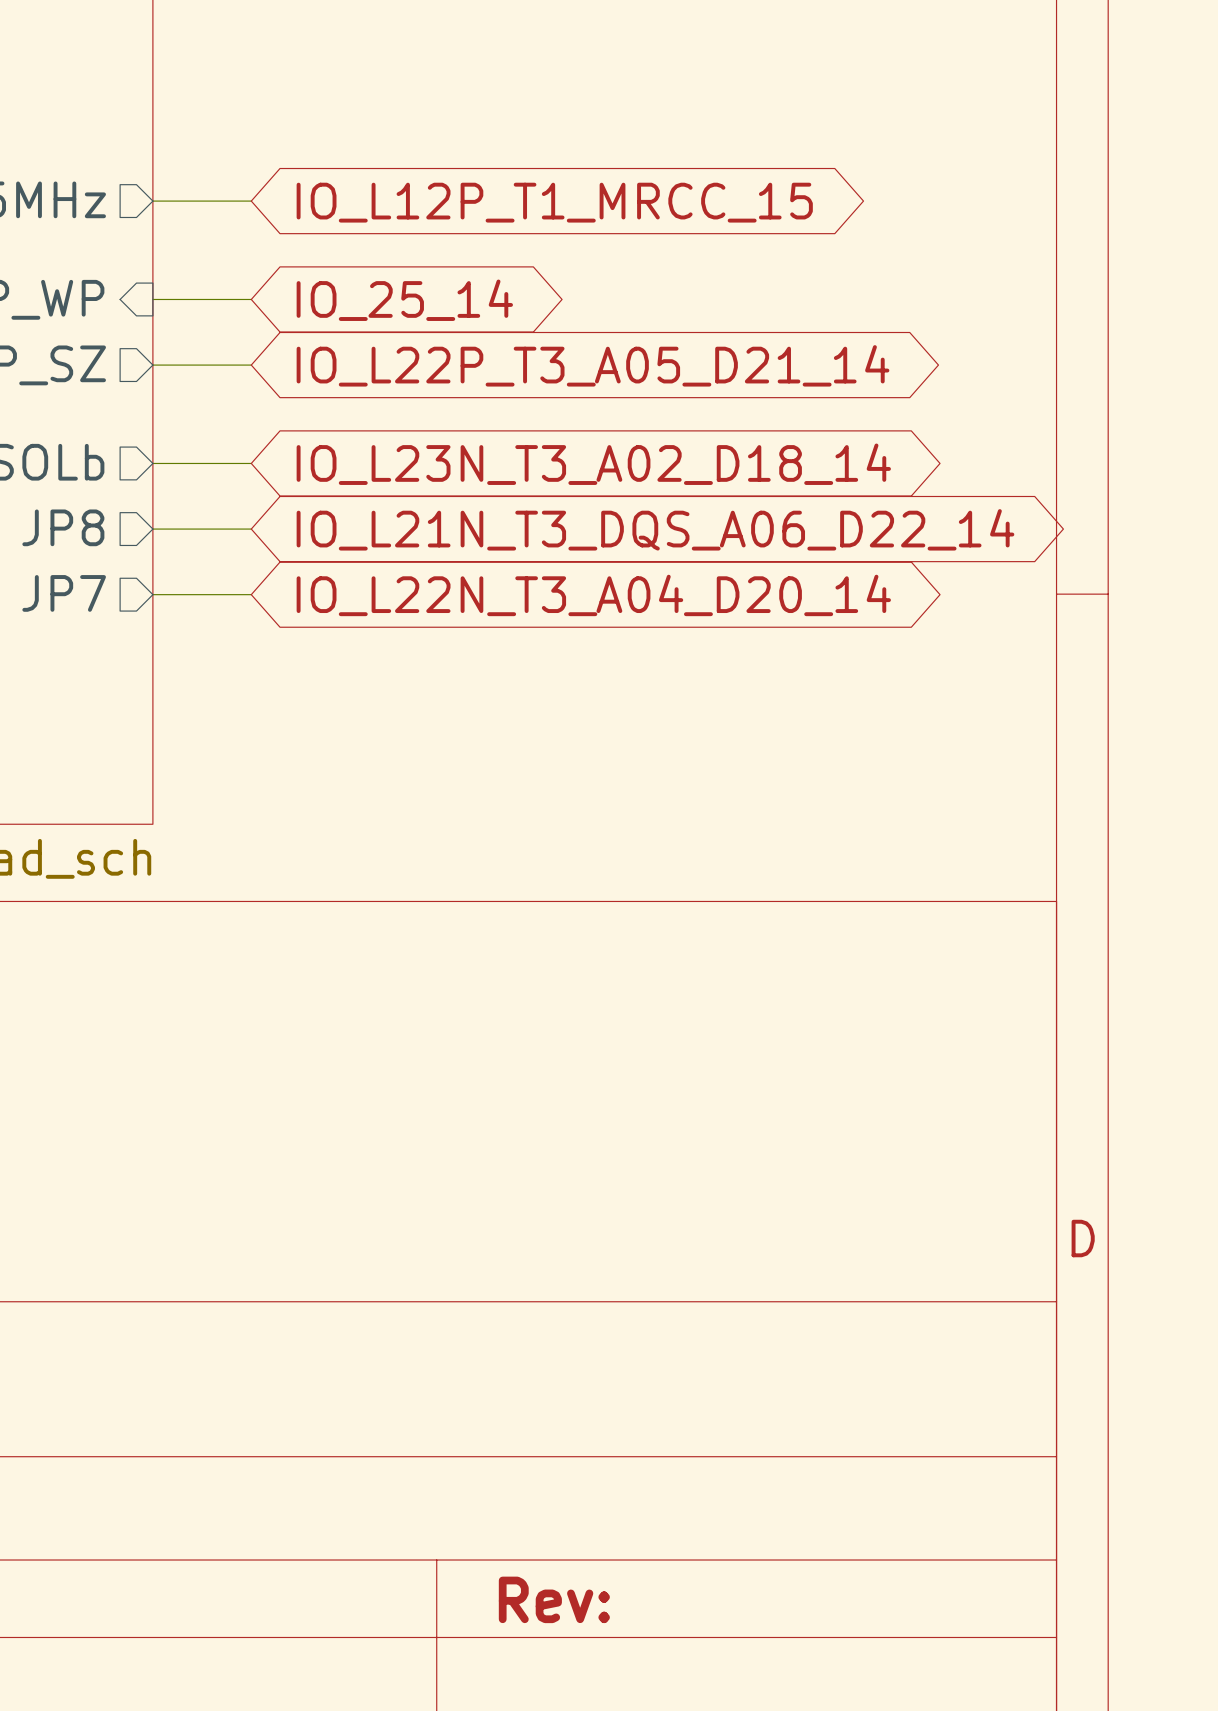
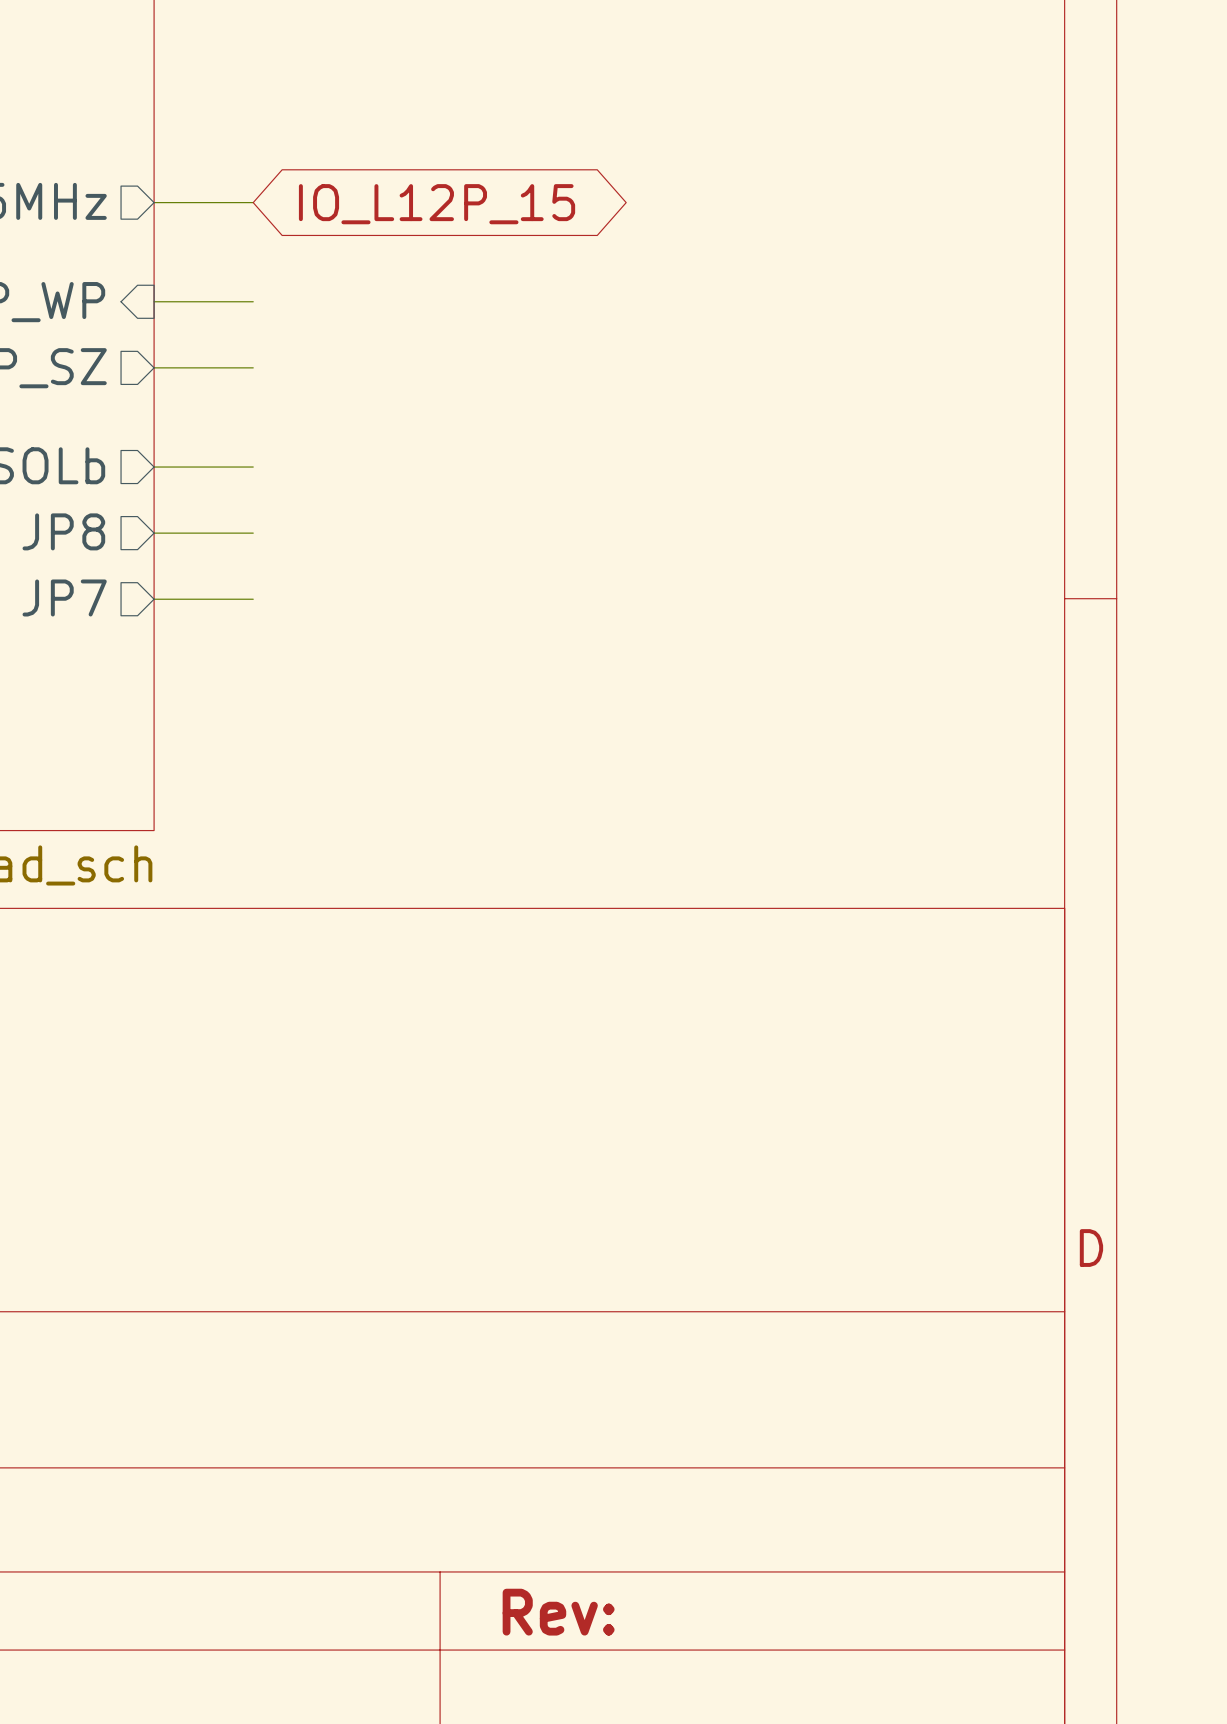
global label: IO_L12P_T1_MRCC_15 (554, 202) -> IO_L12P_15 (437, 204)
global label: IO_25_14 (404, 300) -> none
global label: IO_L22P_T3_A05_D21_14 (593, 365) -> none
global label: IO_L23N_T3_A02_D18_14 (593, 464) -> none
global label: IO_L21N_T3_DQS_A06_D22_14 (655, 529) -> none
global label: IO_L22N_T3_A04_D20_14 (593, 595) -> none

